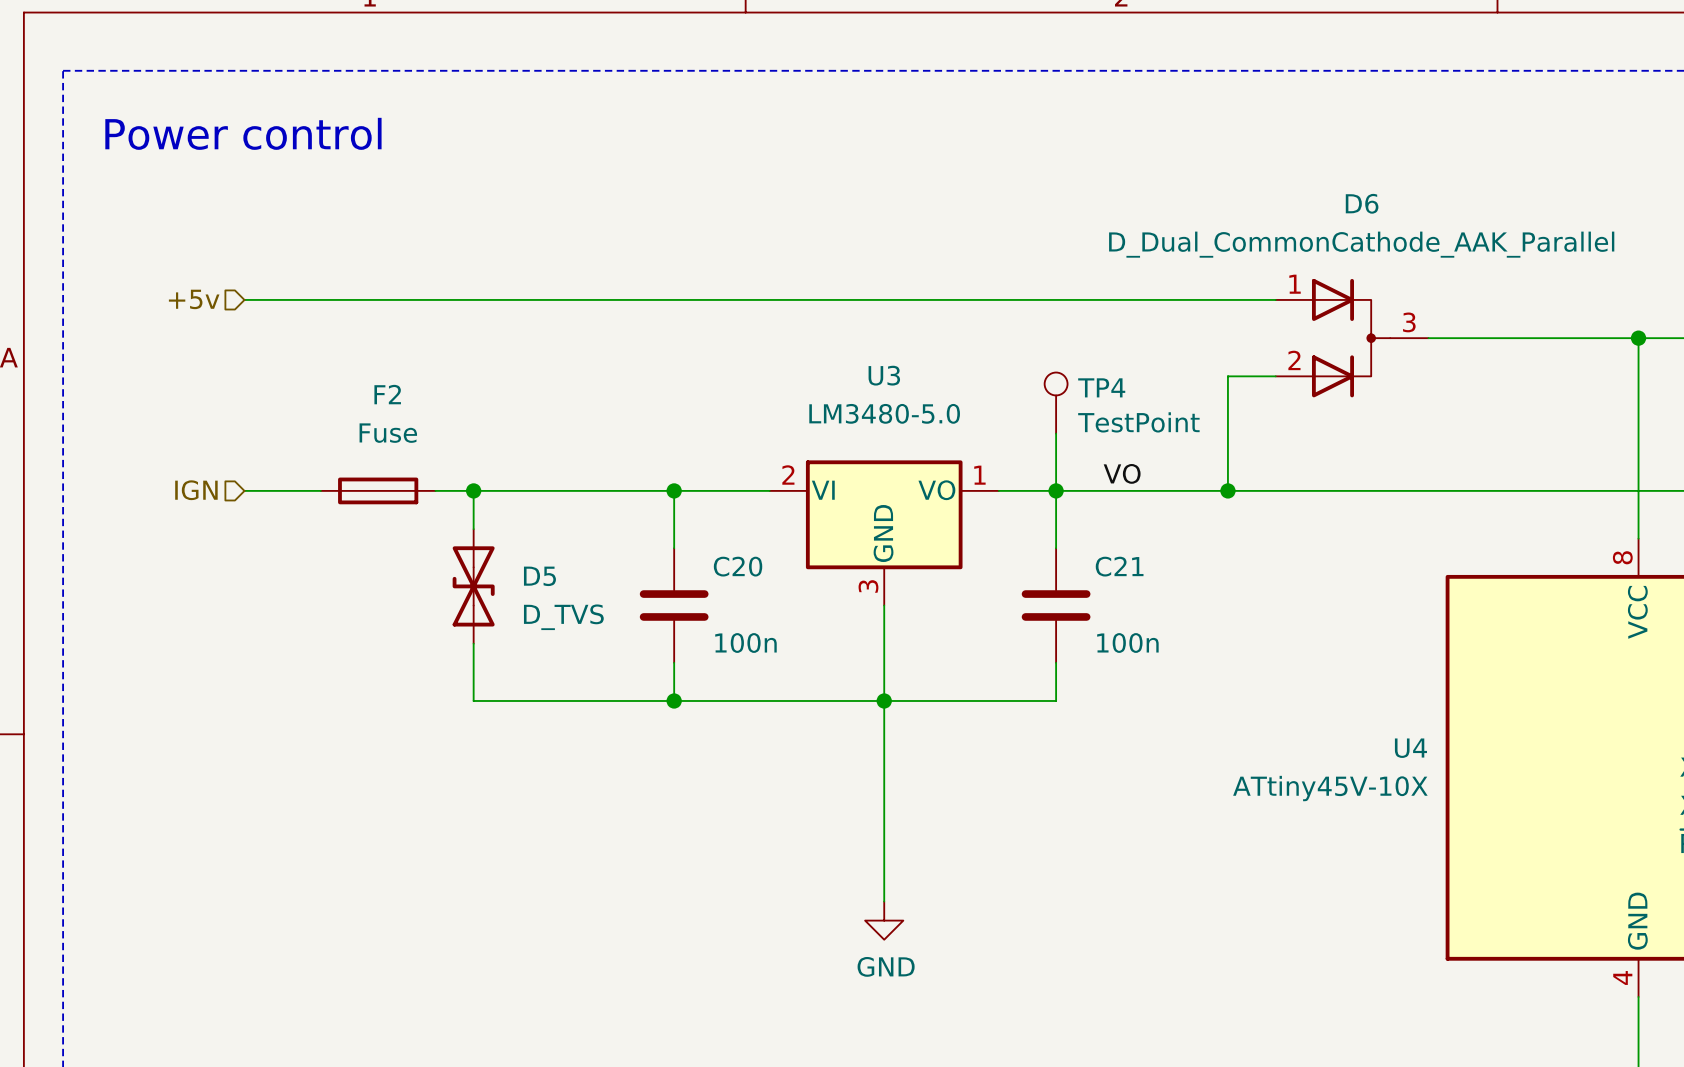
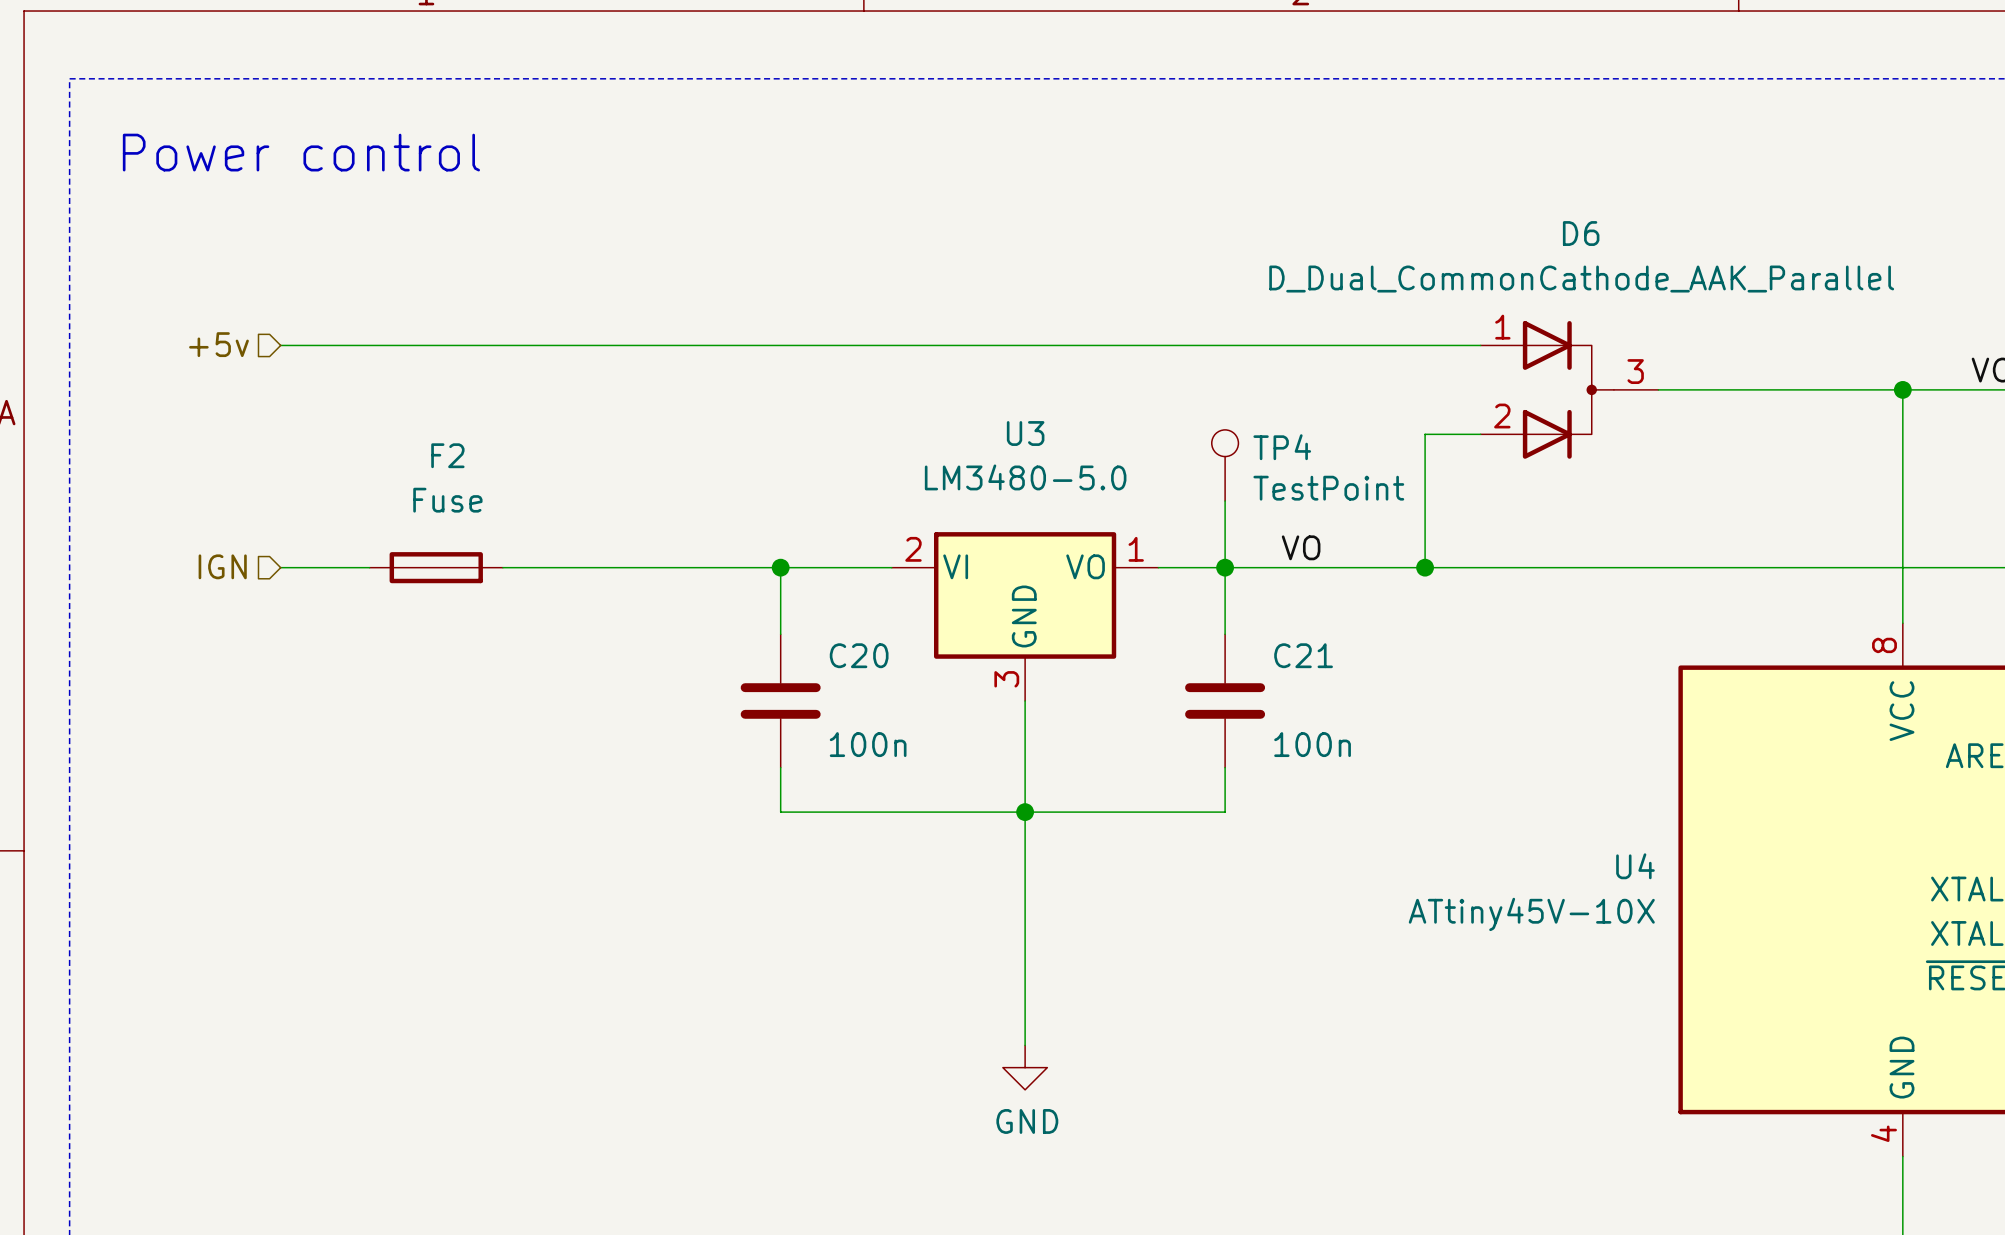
wire: (473, 490) (473, 529) -> none
junction: (473, 490) -> none
D5: D_TVS (473, 586) -> none
wire: (473, 643) (473, 700) (674, 700) -> none
junction: (674, 700) -> none

